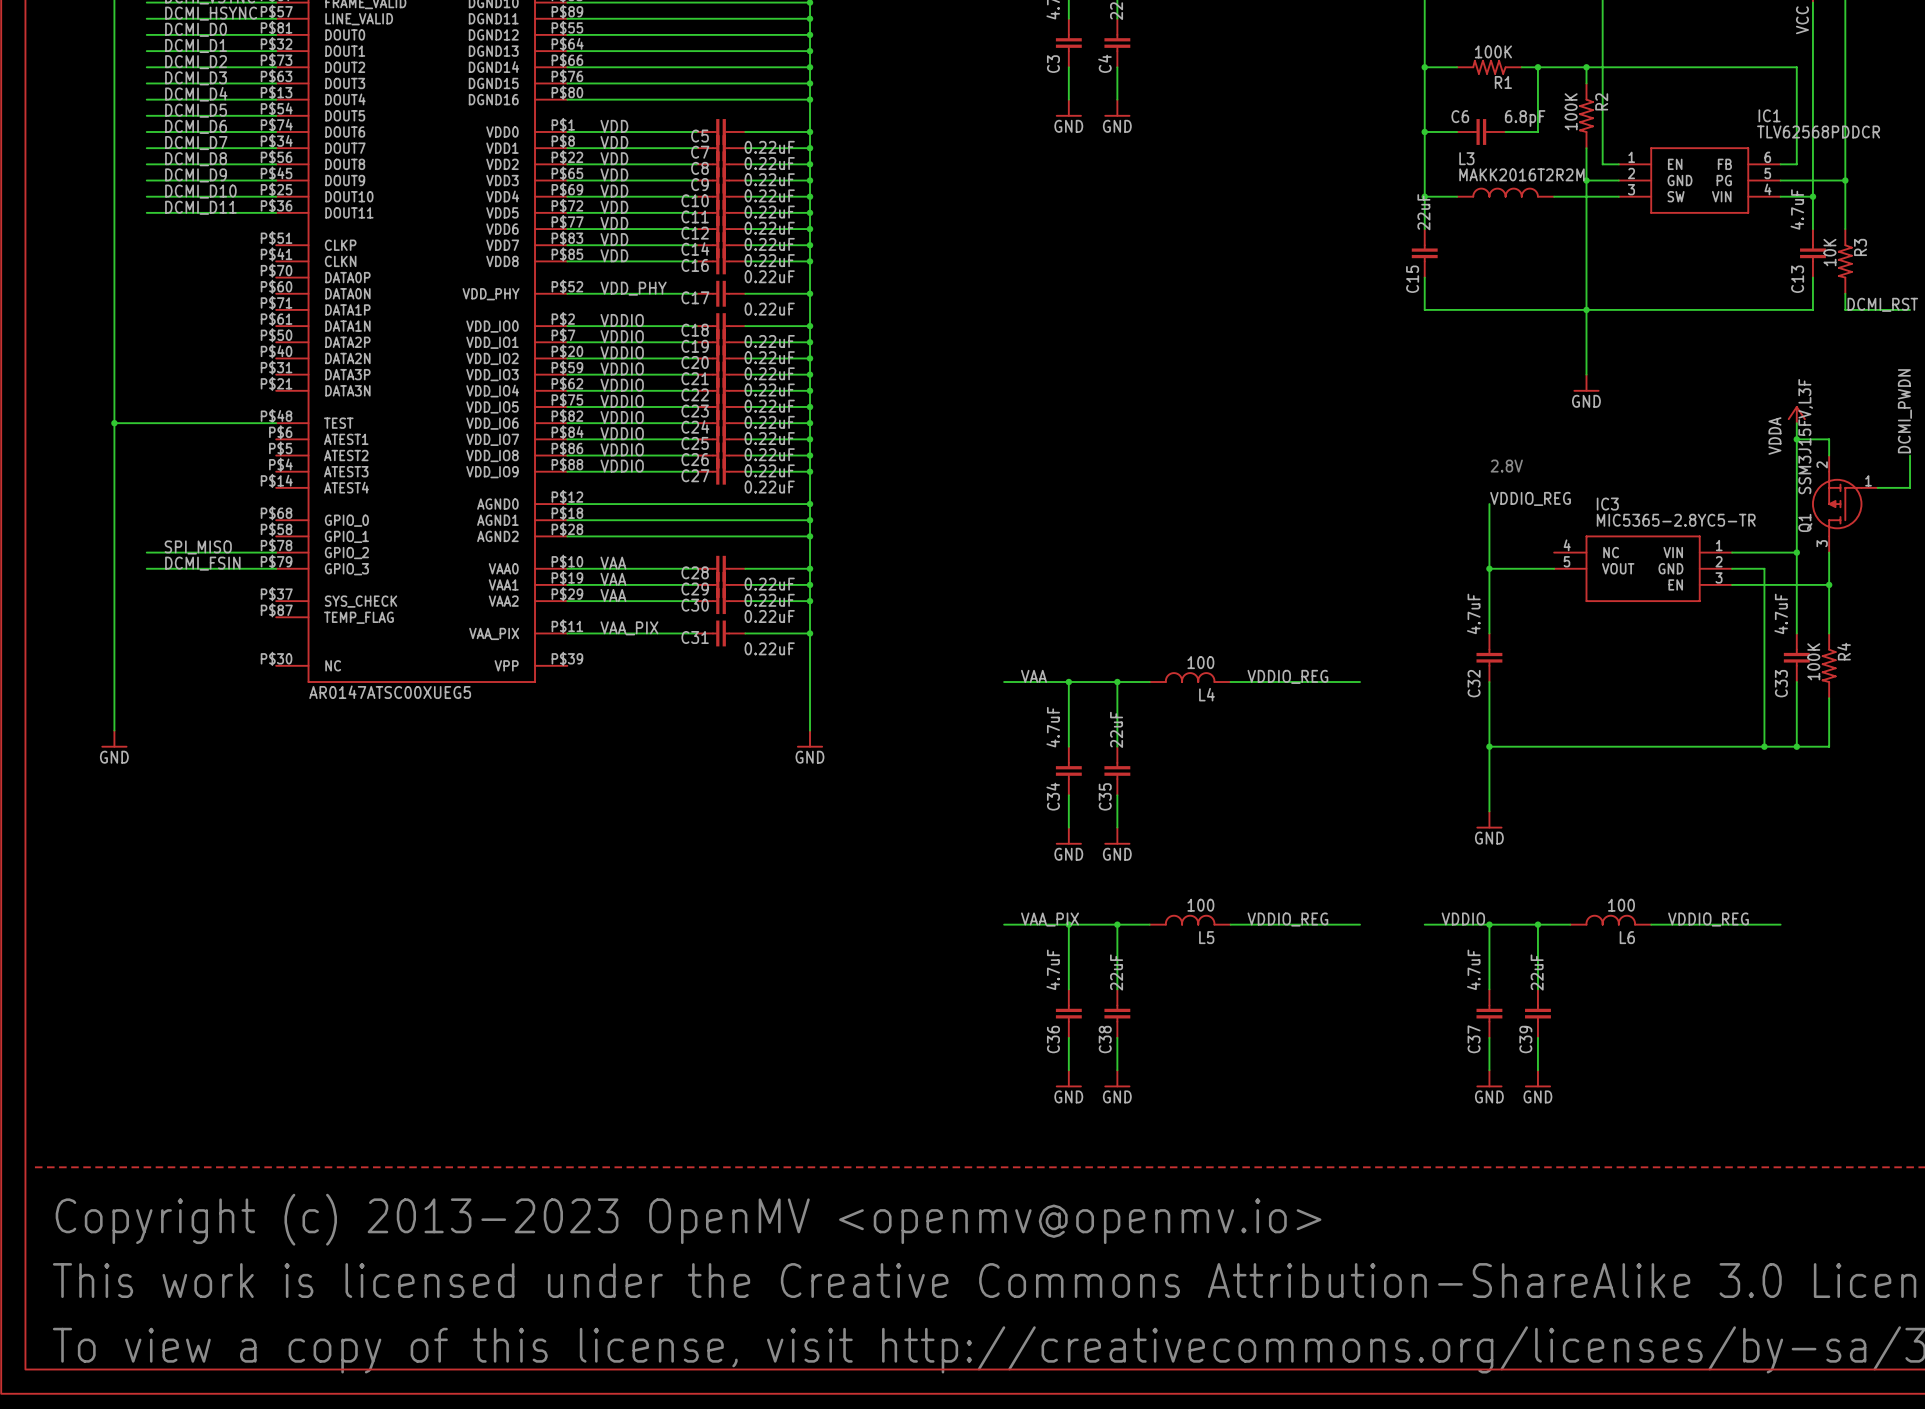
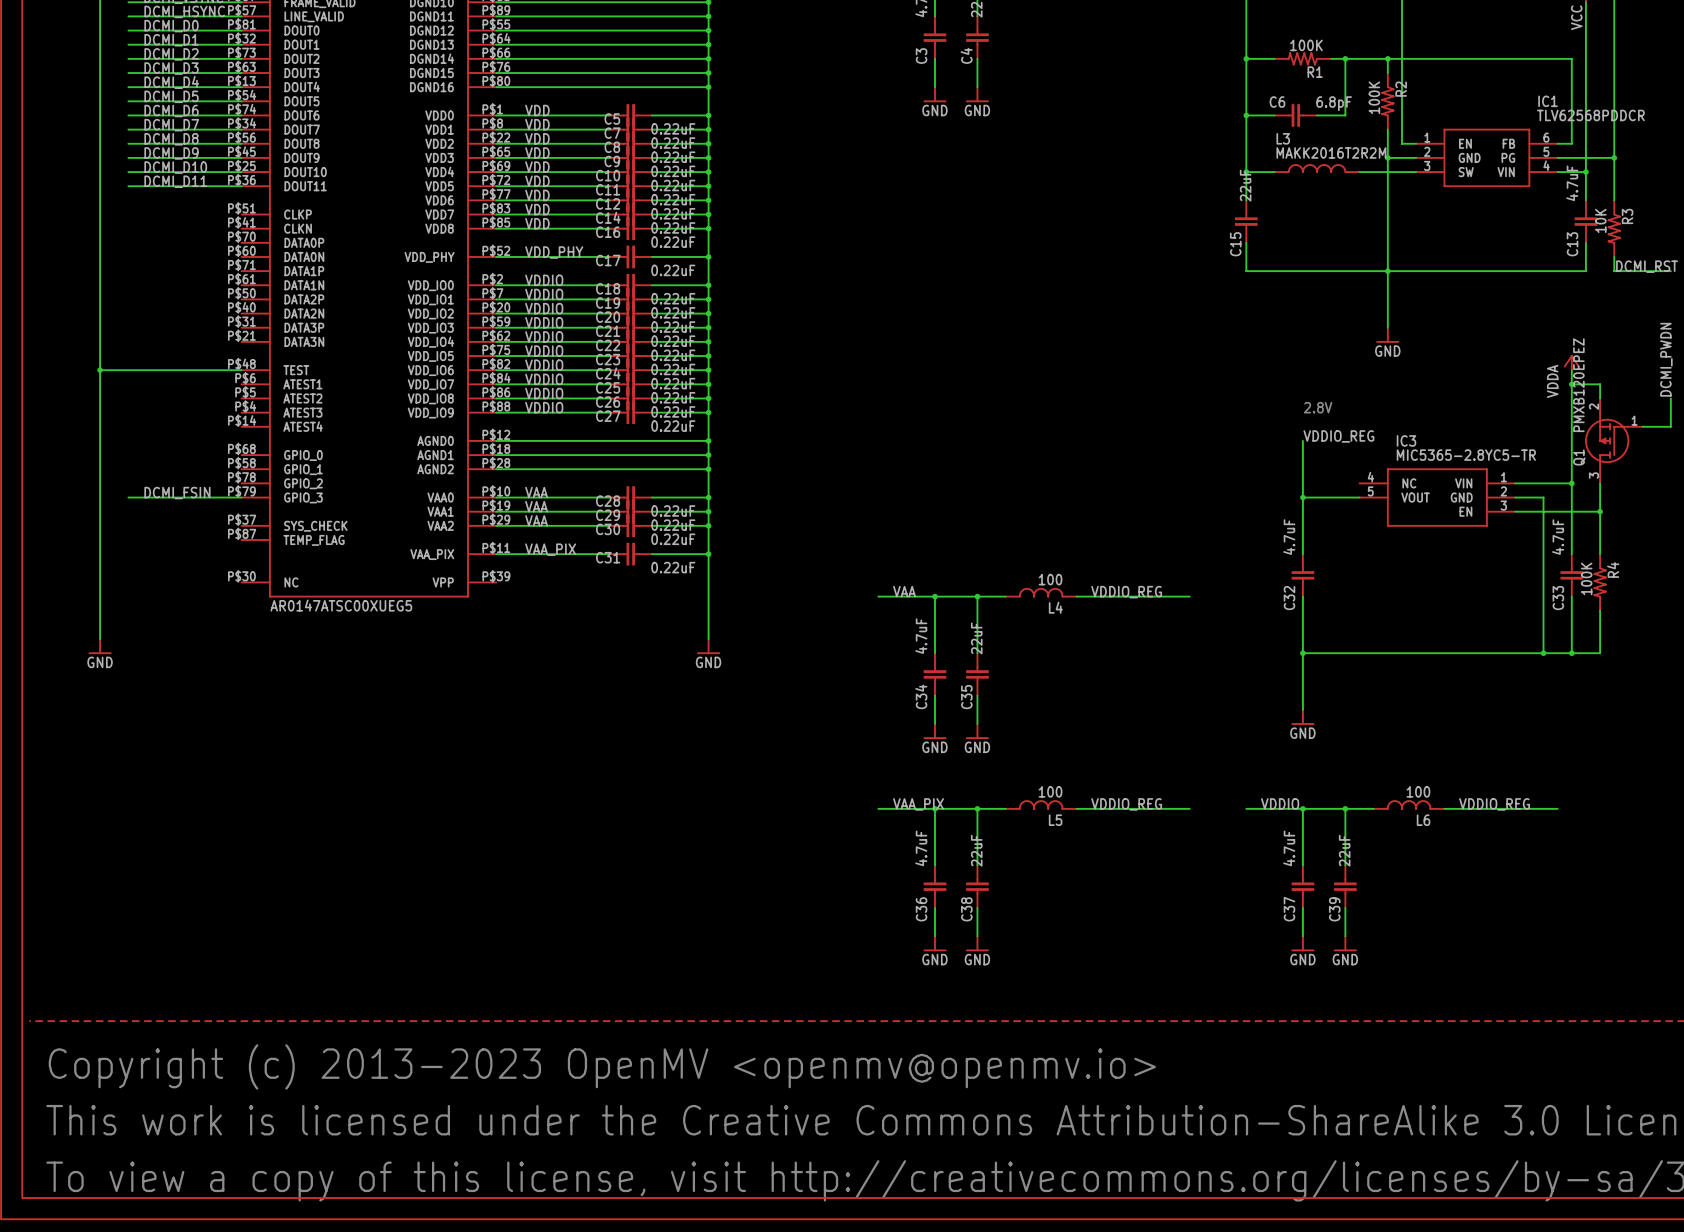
Q1 value: SSM3J15FV,L3F (1805, 436) -> PMXB120EPEZ (1578, 385)
label: SPI_MISO (198, 547) -> none
wire: (146, 552) (276, 552) -> none

